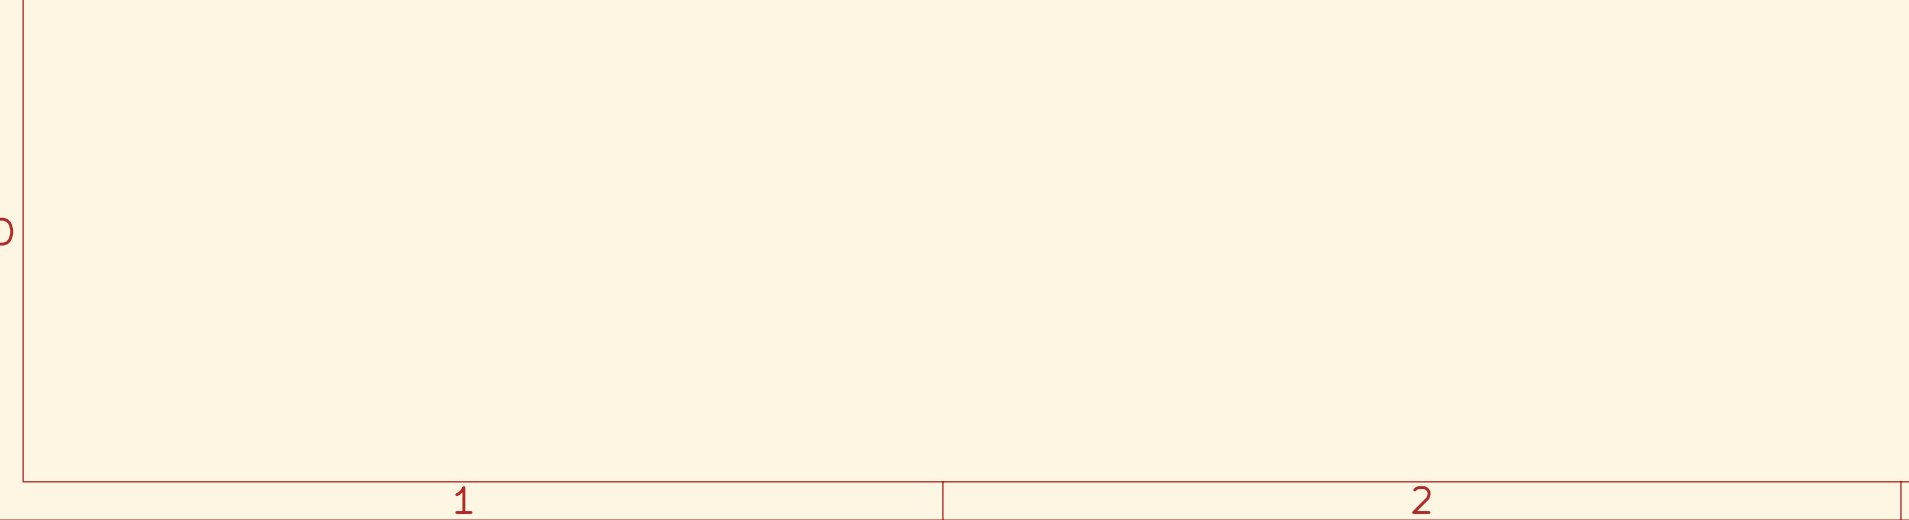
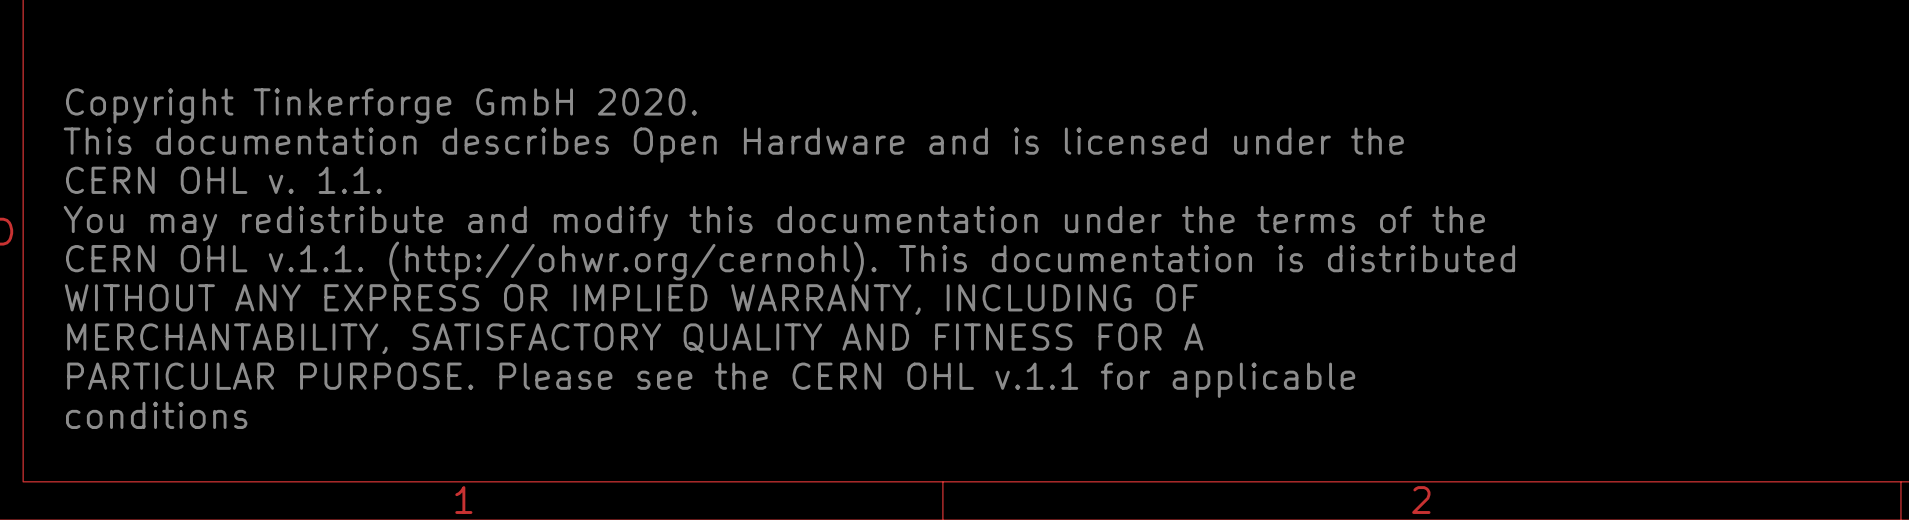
text: none -> Copyright Tinkerforge GmbH 2020. (381, 106)
text: none -> This documentation describes Open Hardware and is licensed under the (733, 145)
text: none -> CERN OHL v. 1.1. (223, 180)
text: none -> You may redistribute and modify this documentation under the terms of the (774, 223)
text: none -> CERN OHL v.1.1. (http://ohwr.org/cernohl). This documentation is distributed (790, 261)
text: none -> WITHOUT ANY EXPRESS OR IMPLIED WARRANTY, INCLUDING OF (631, 299)
text: none -> MERCHANTABILITY, SATISFACTORY QUALITY AND FITNESS FOR A (635, 338)
text: none -> PARTICULAR PURPOSE. Please see the CERN OHL v.1.1 for applicable (711, 380)
text: none -> conditions (156, 415)

